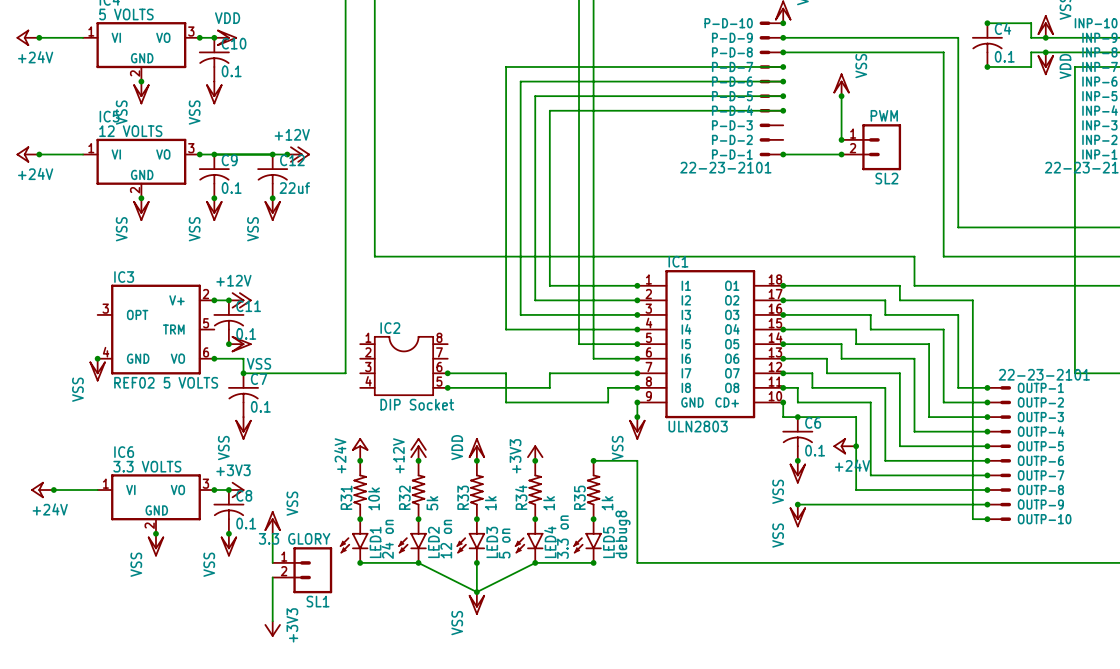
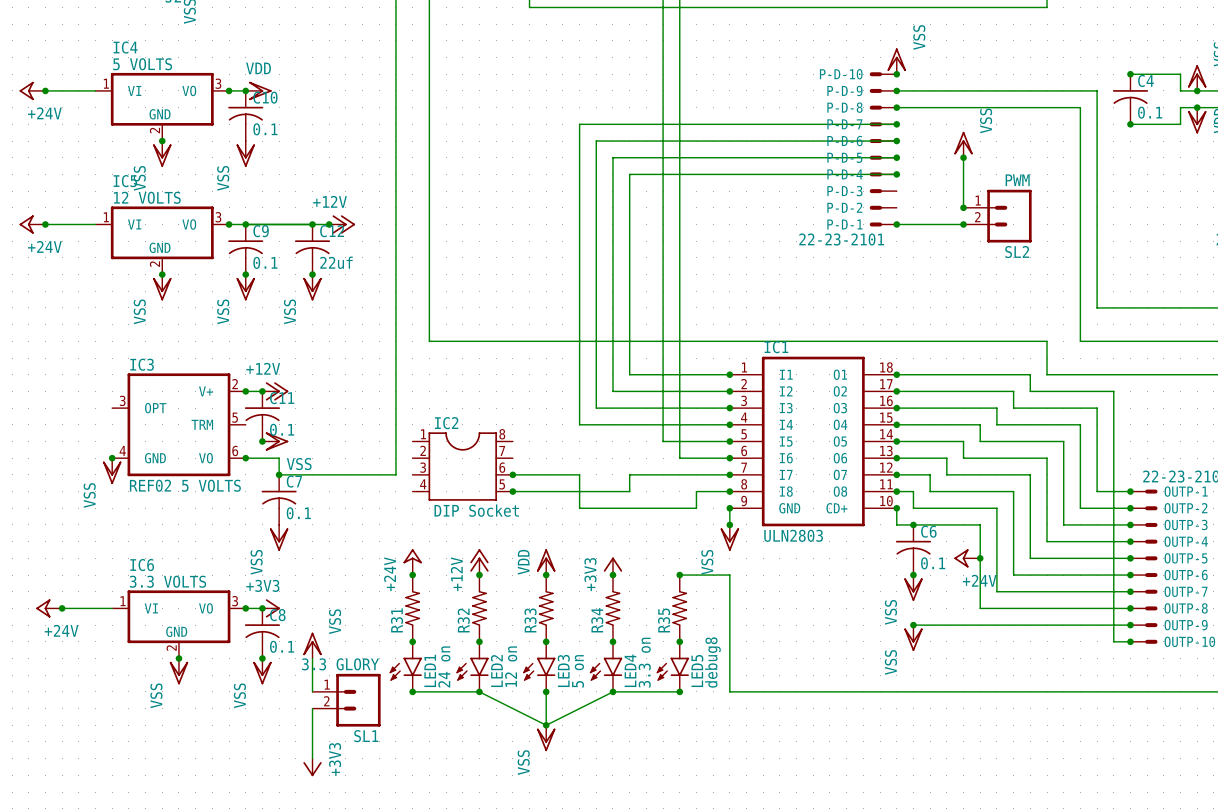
R31 value: 10k (374, 498) -> none
R32 value: 5k (432, 503) -> none
R33 value: 1k (490, 503) -> none
R34 value: 1k (549, 503) -> none
R35 value: 1k (607, 503) -> none

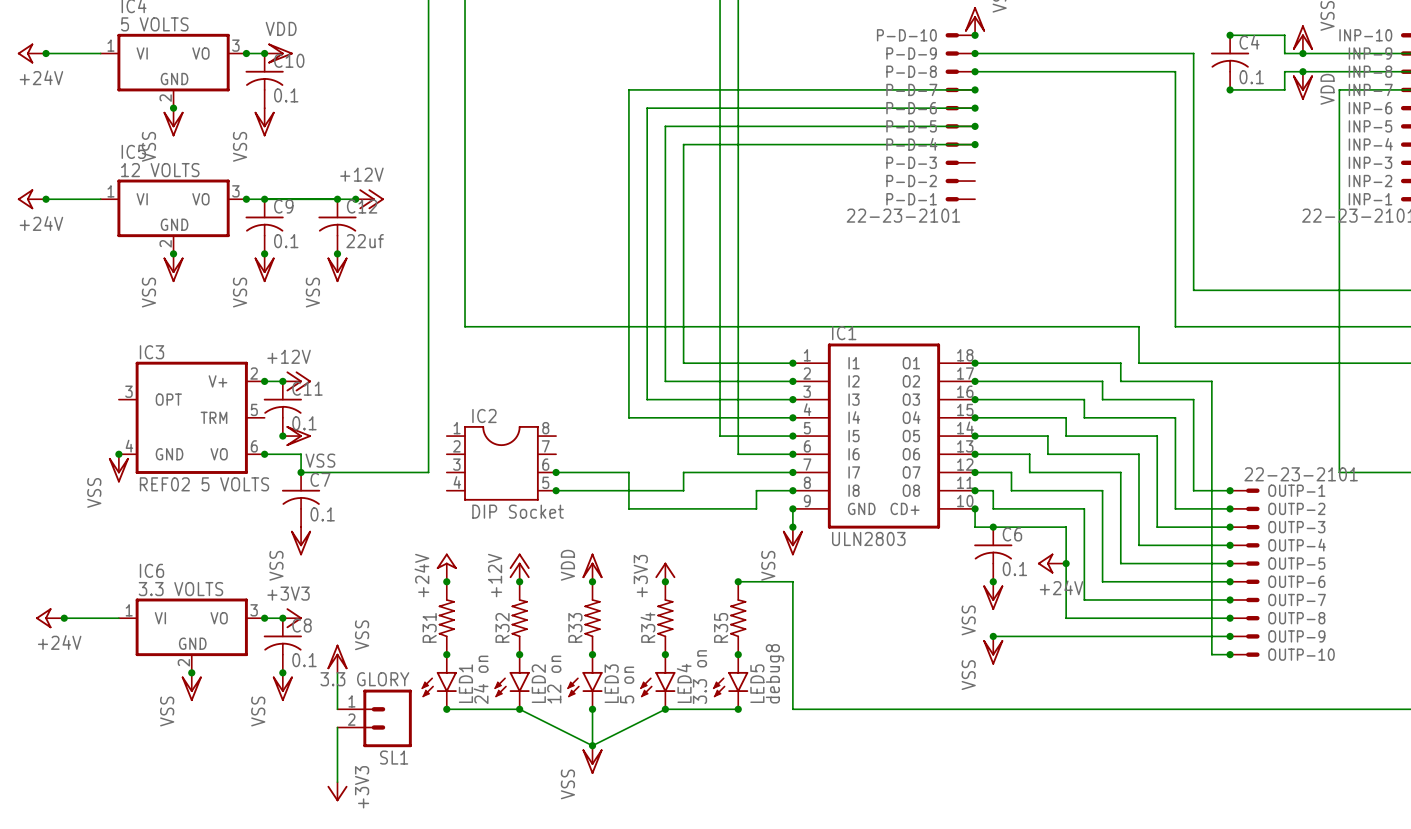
power symbol: VSS (963, 144) -> none
wire: (963, 157) (963, 207) -> none
junction: (963, 157) -> none
junction: (963, 207) -> none
SL2: PWM (997, 216) -> none
wire: (896, 224) (963, 224) -> none
junction: (896, 224) -> none
junction: (963, 224) -> none

